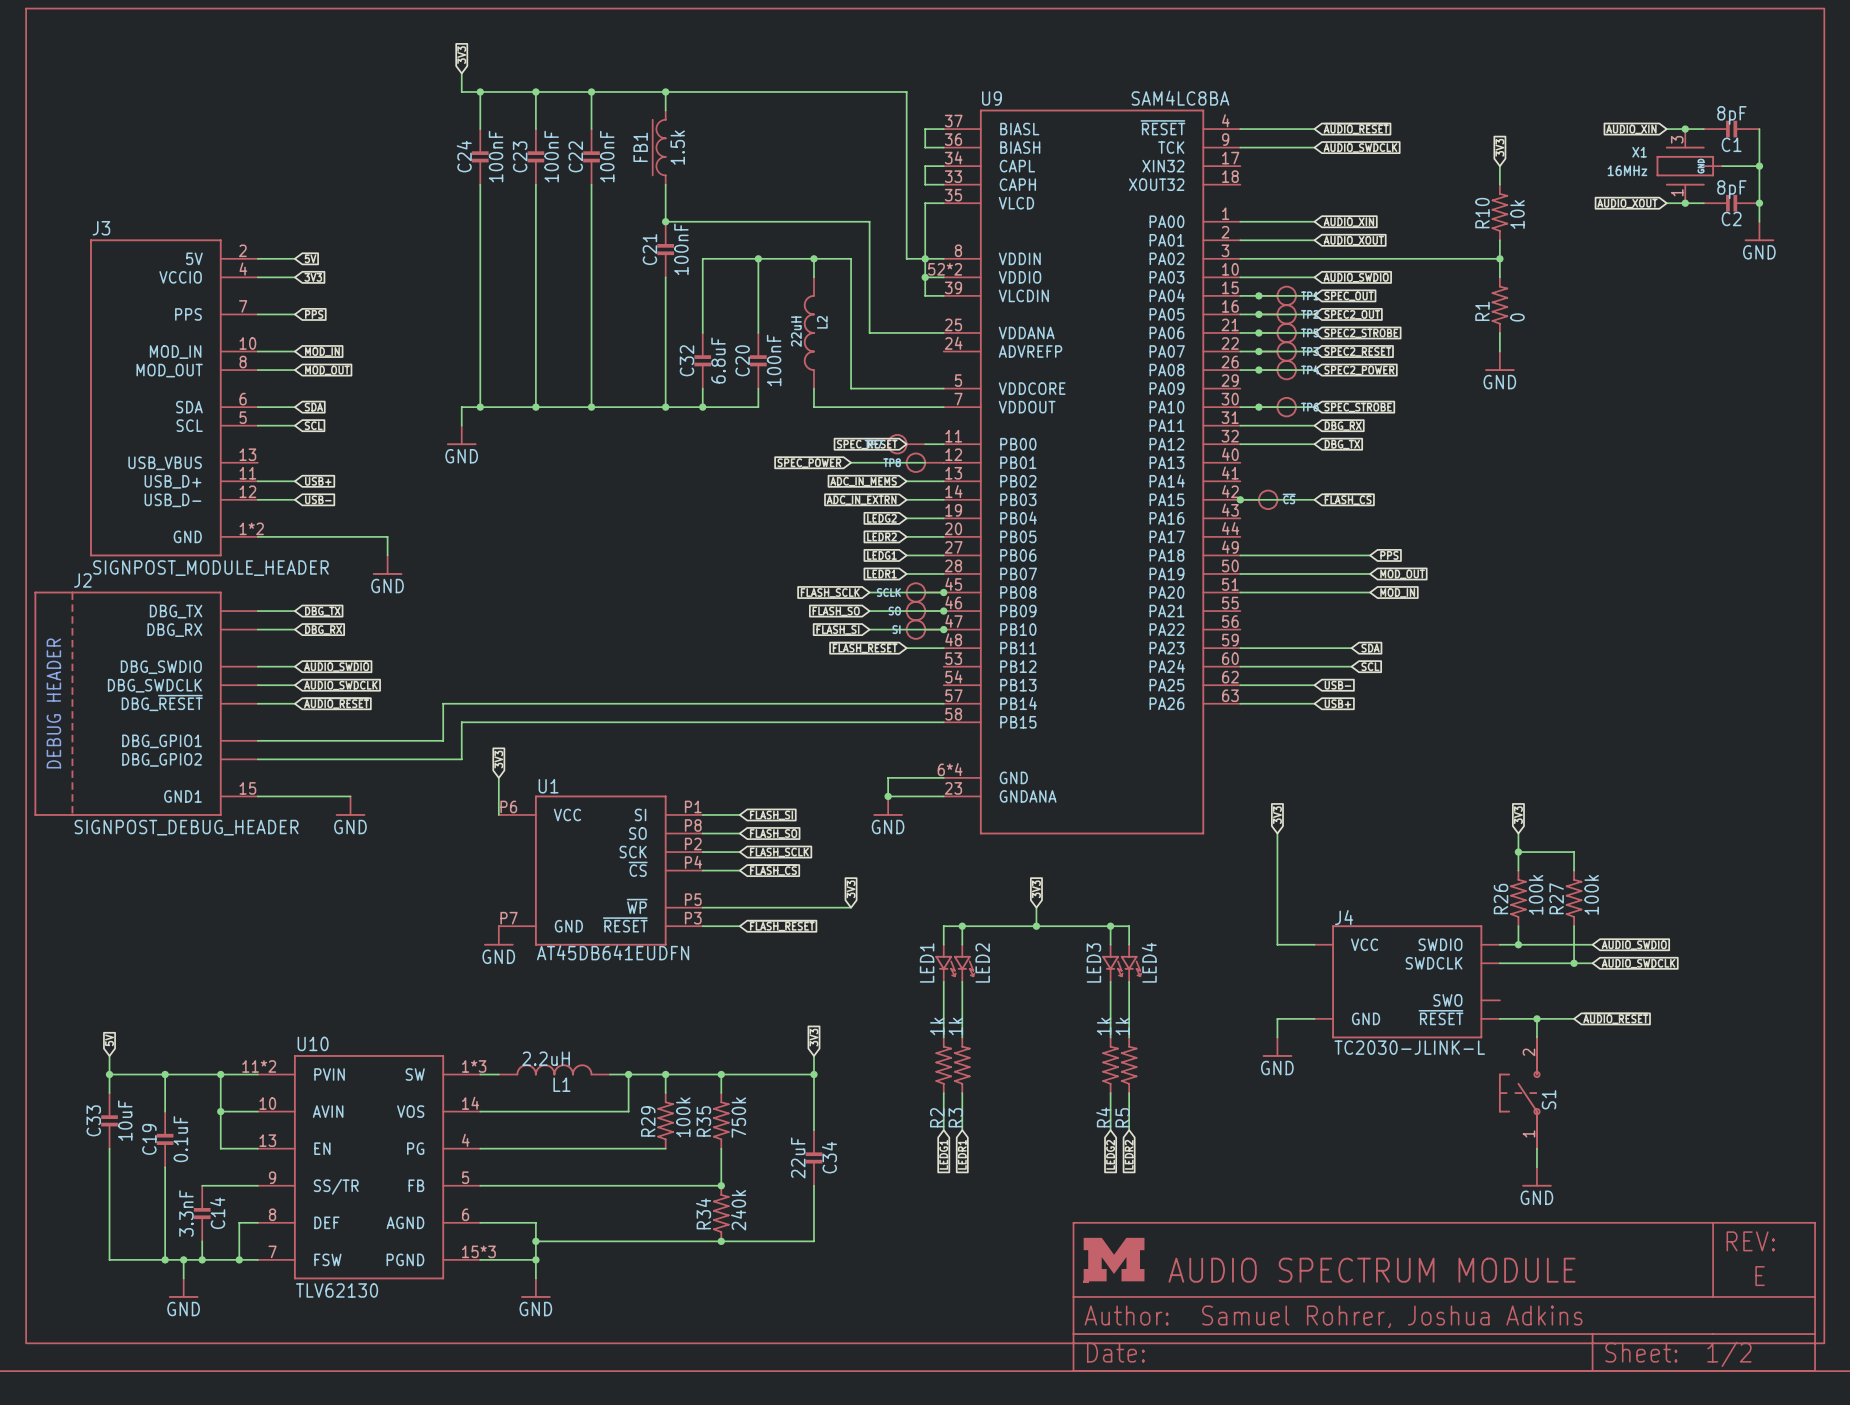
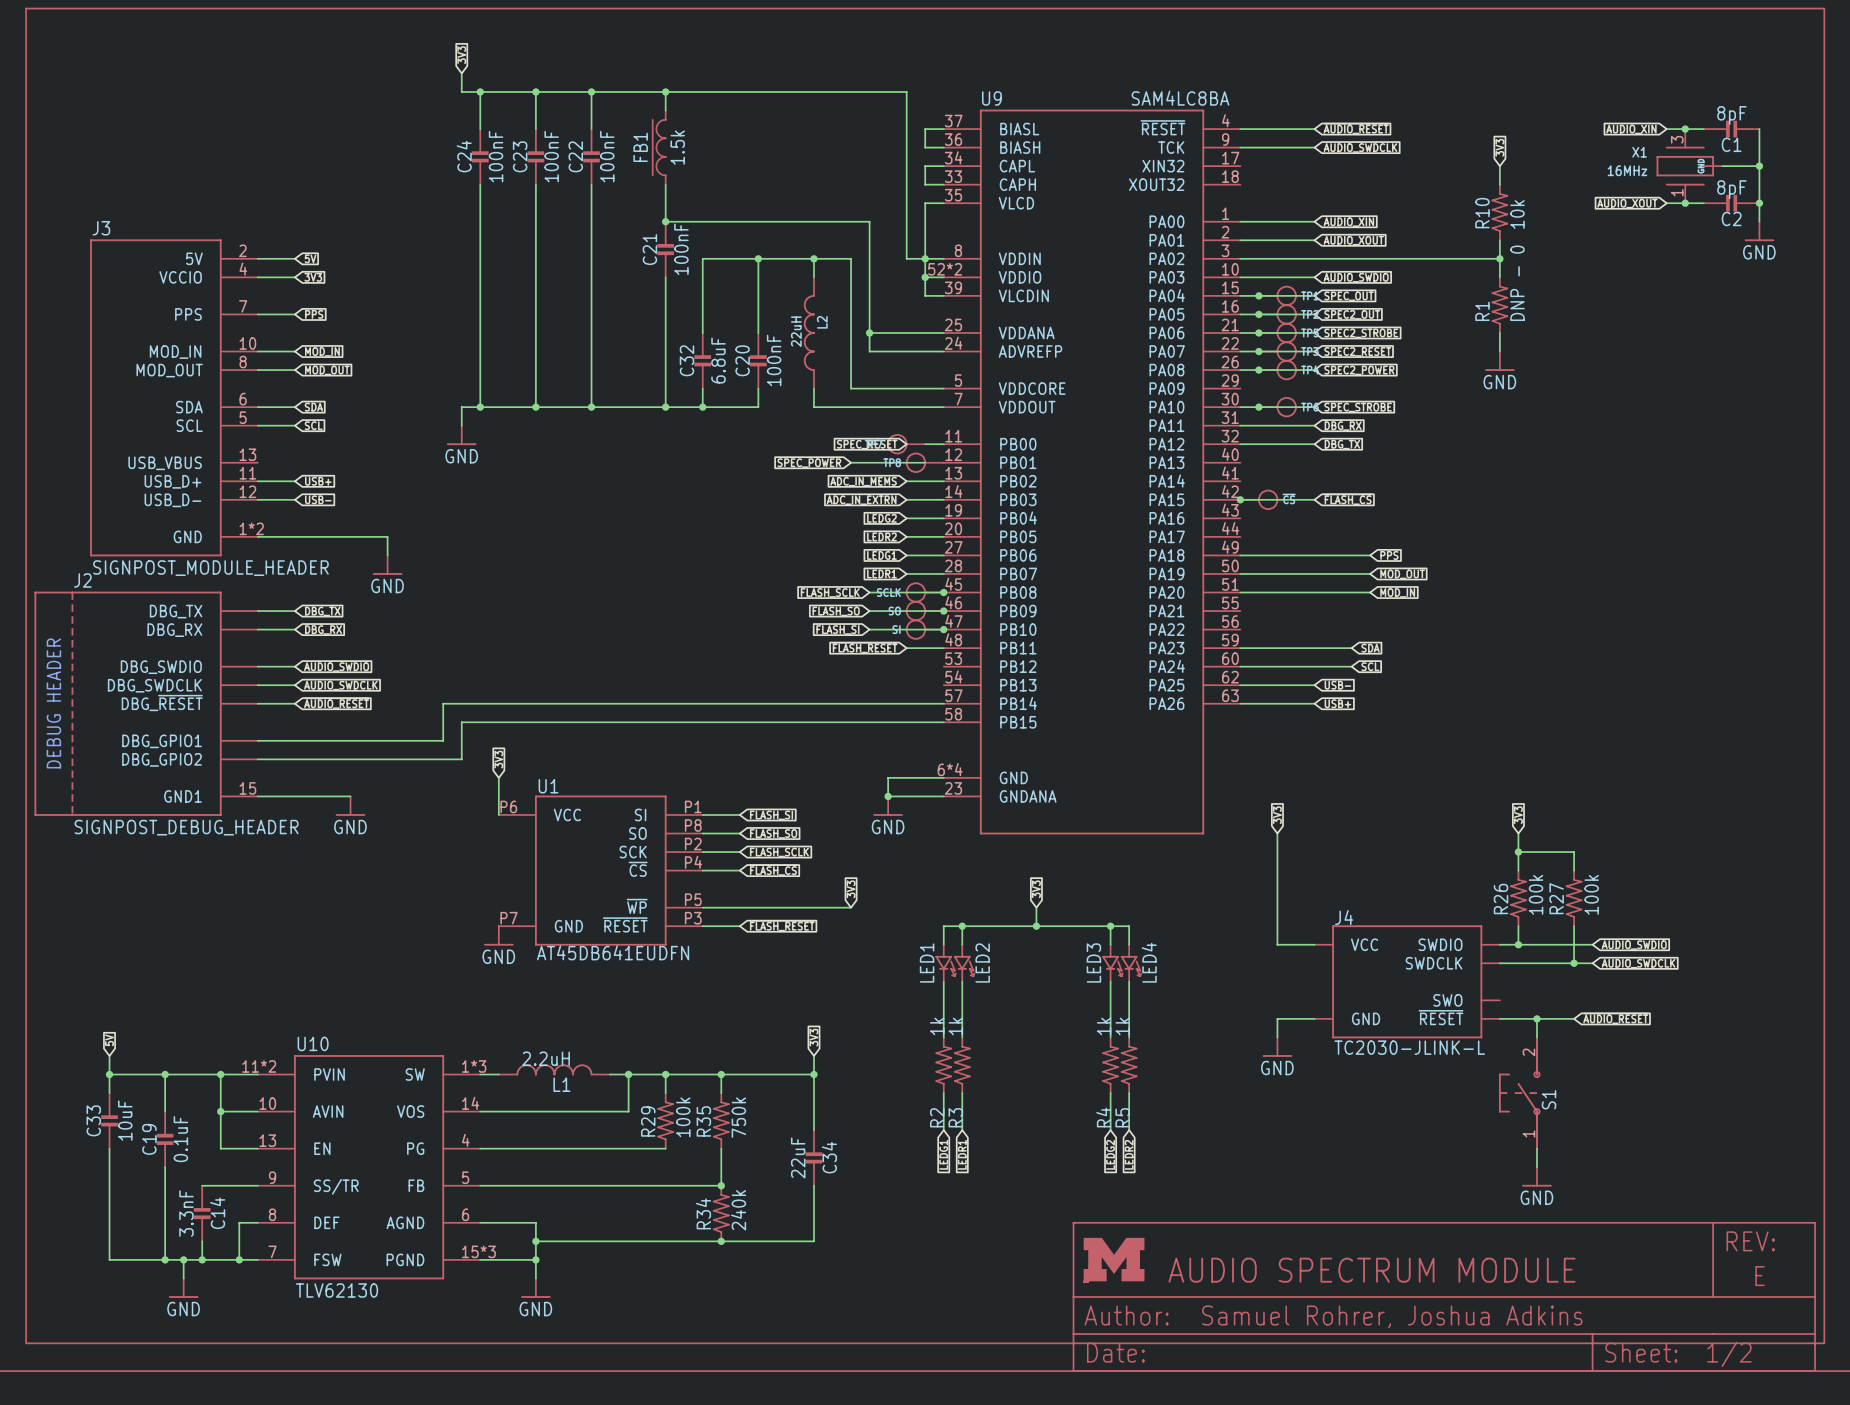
R1 value: 0 (1517, 317) -> DNP - 0 (1517, 283)
wire: none -> (869, 332) (869, 351) (943, 351)
junction: none -> (869, 332)

